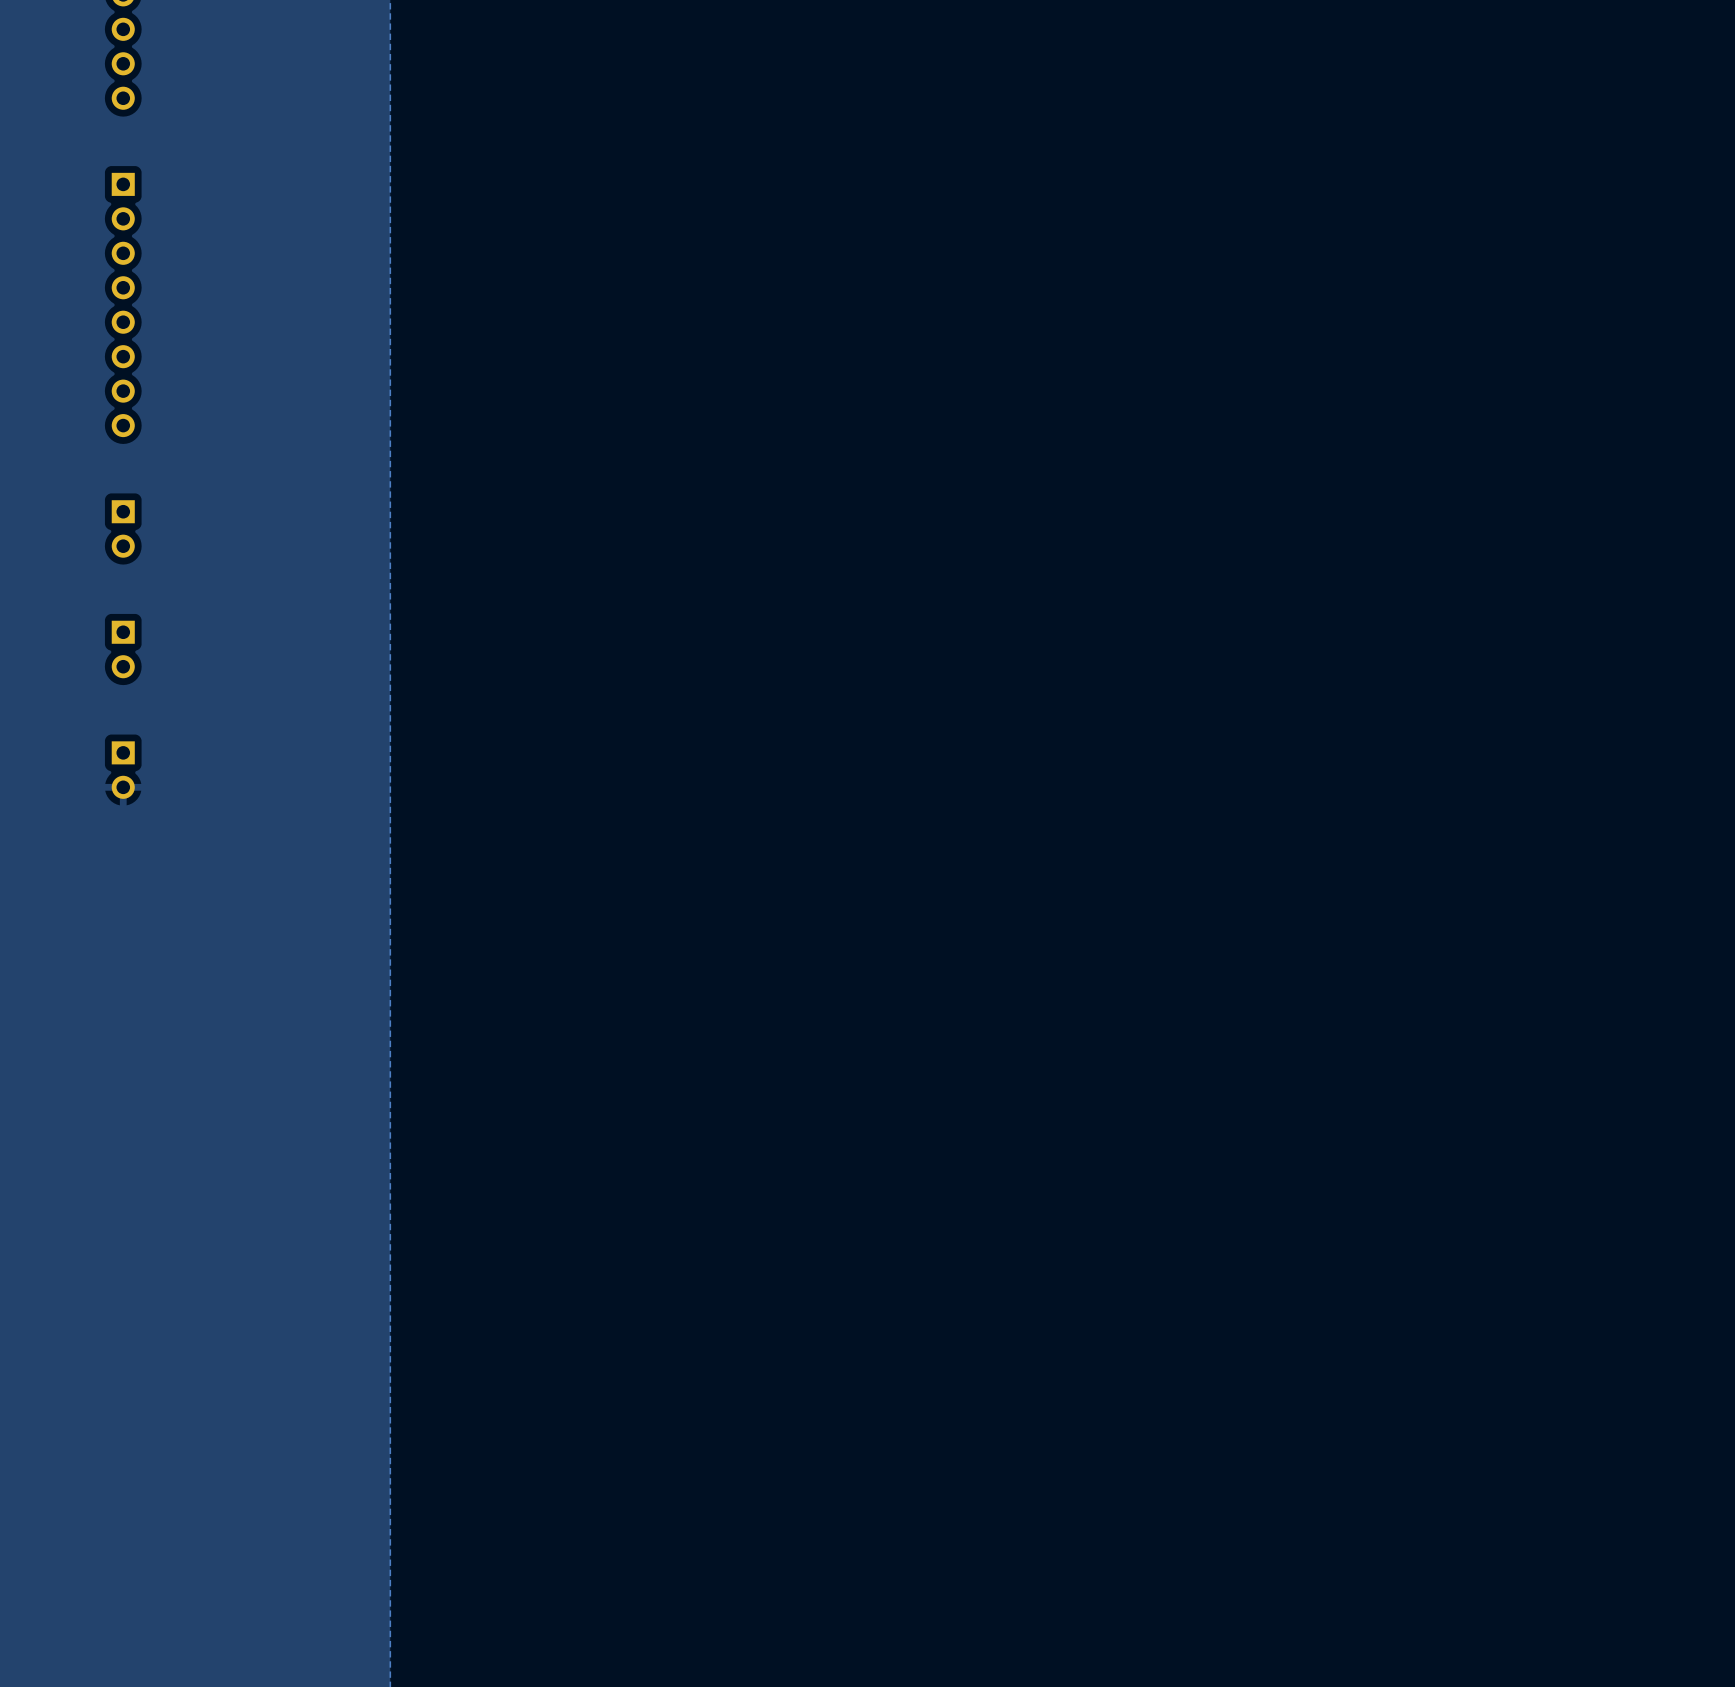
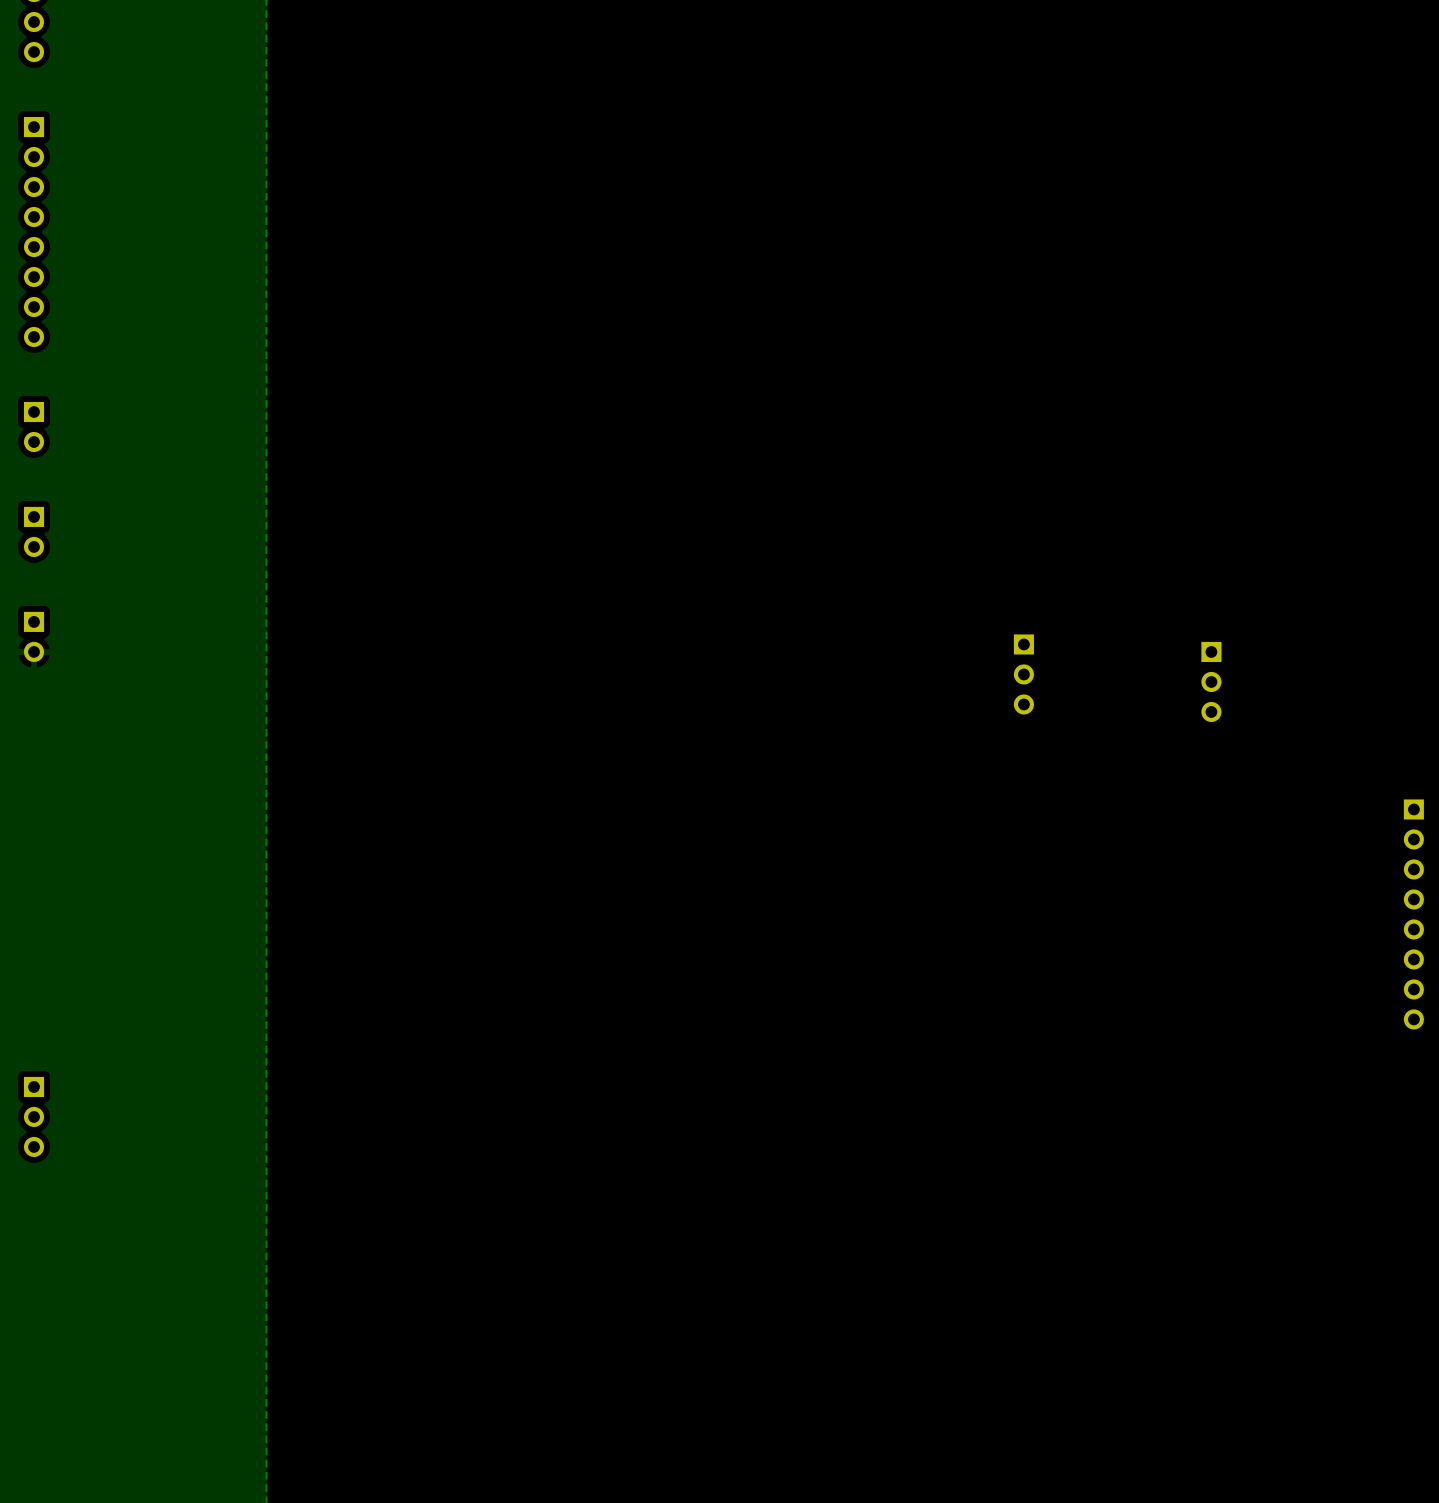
part: none -> (1023, 674)
part: none -> (1211, 681)
part: none -> (1413, 914)
part: none -> (34, 1116)

